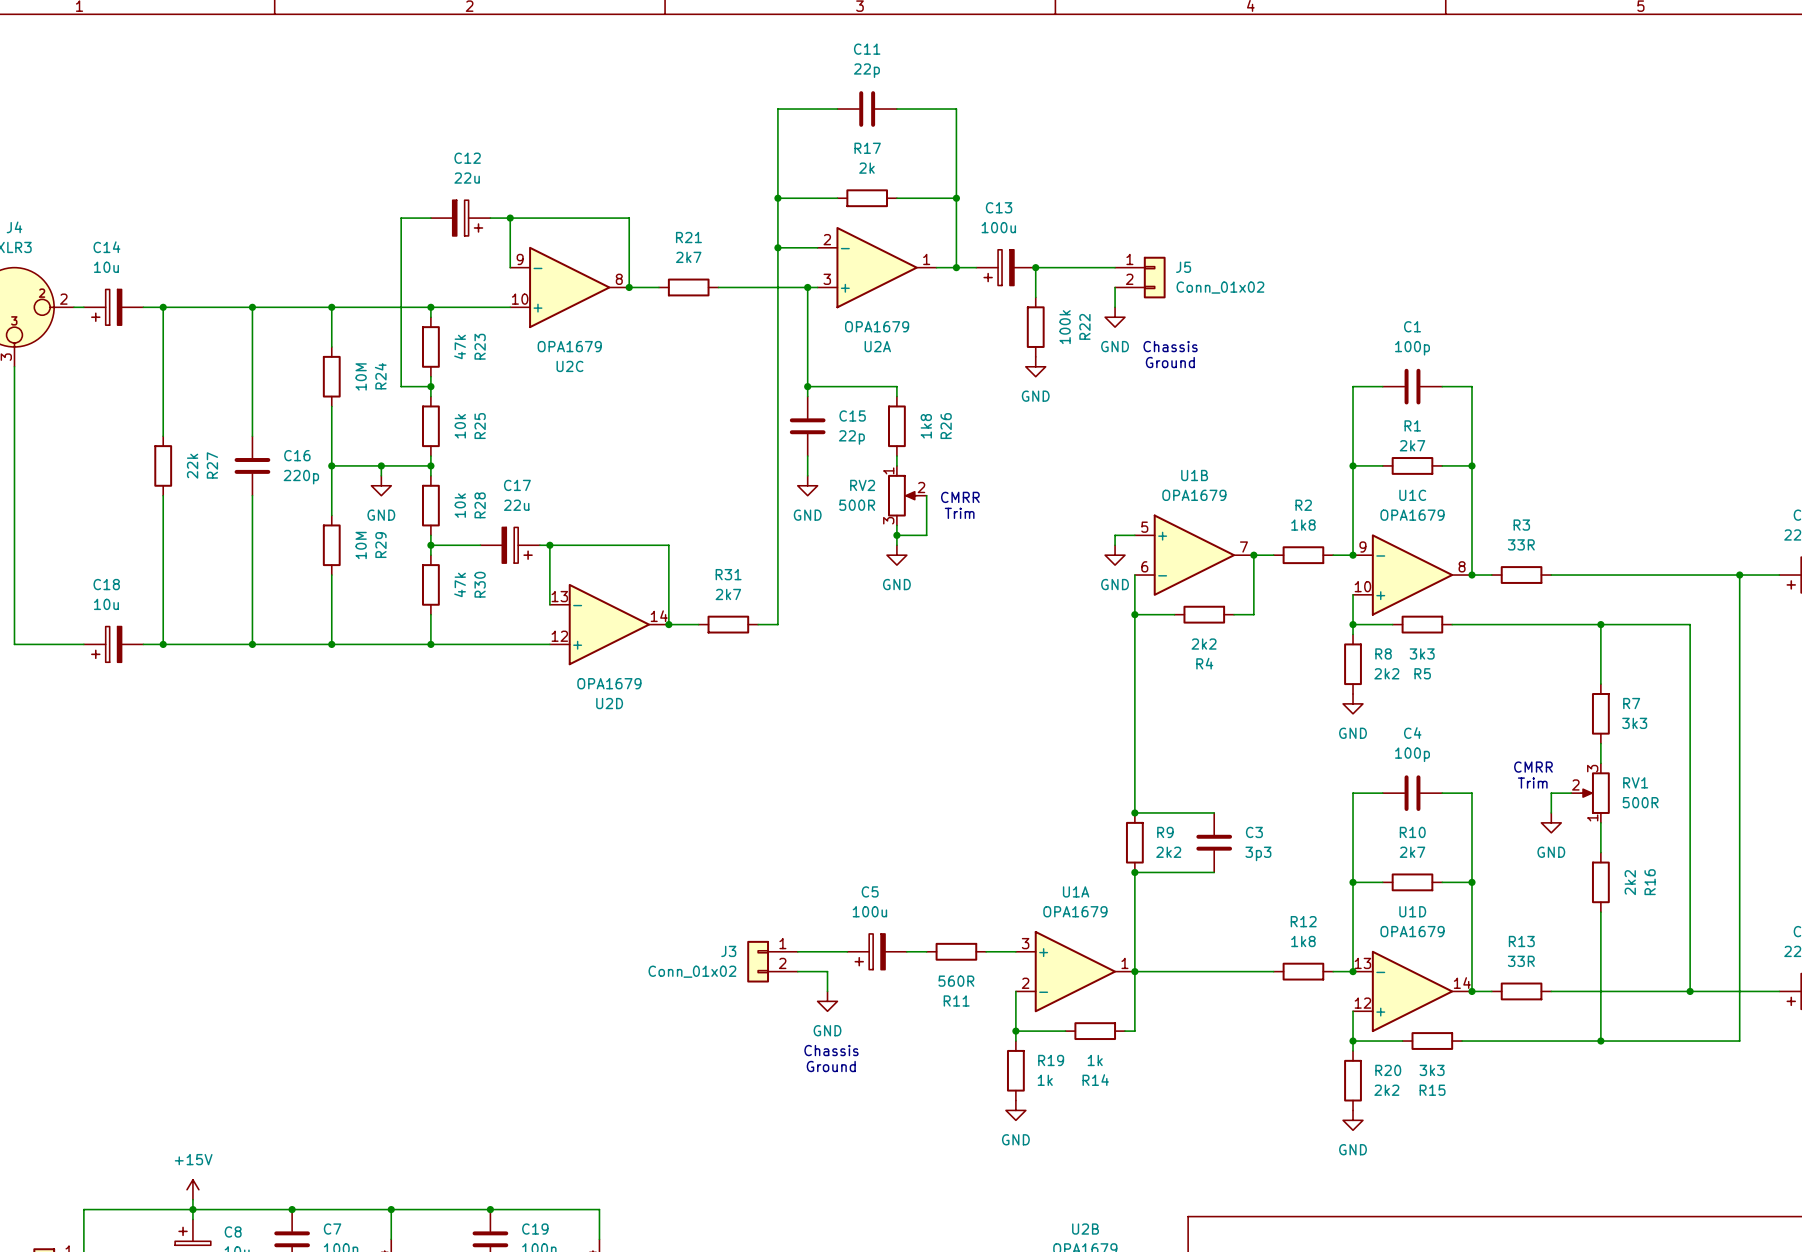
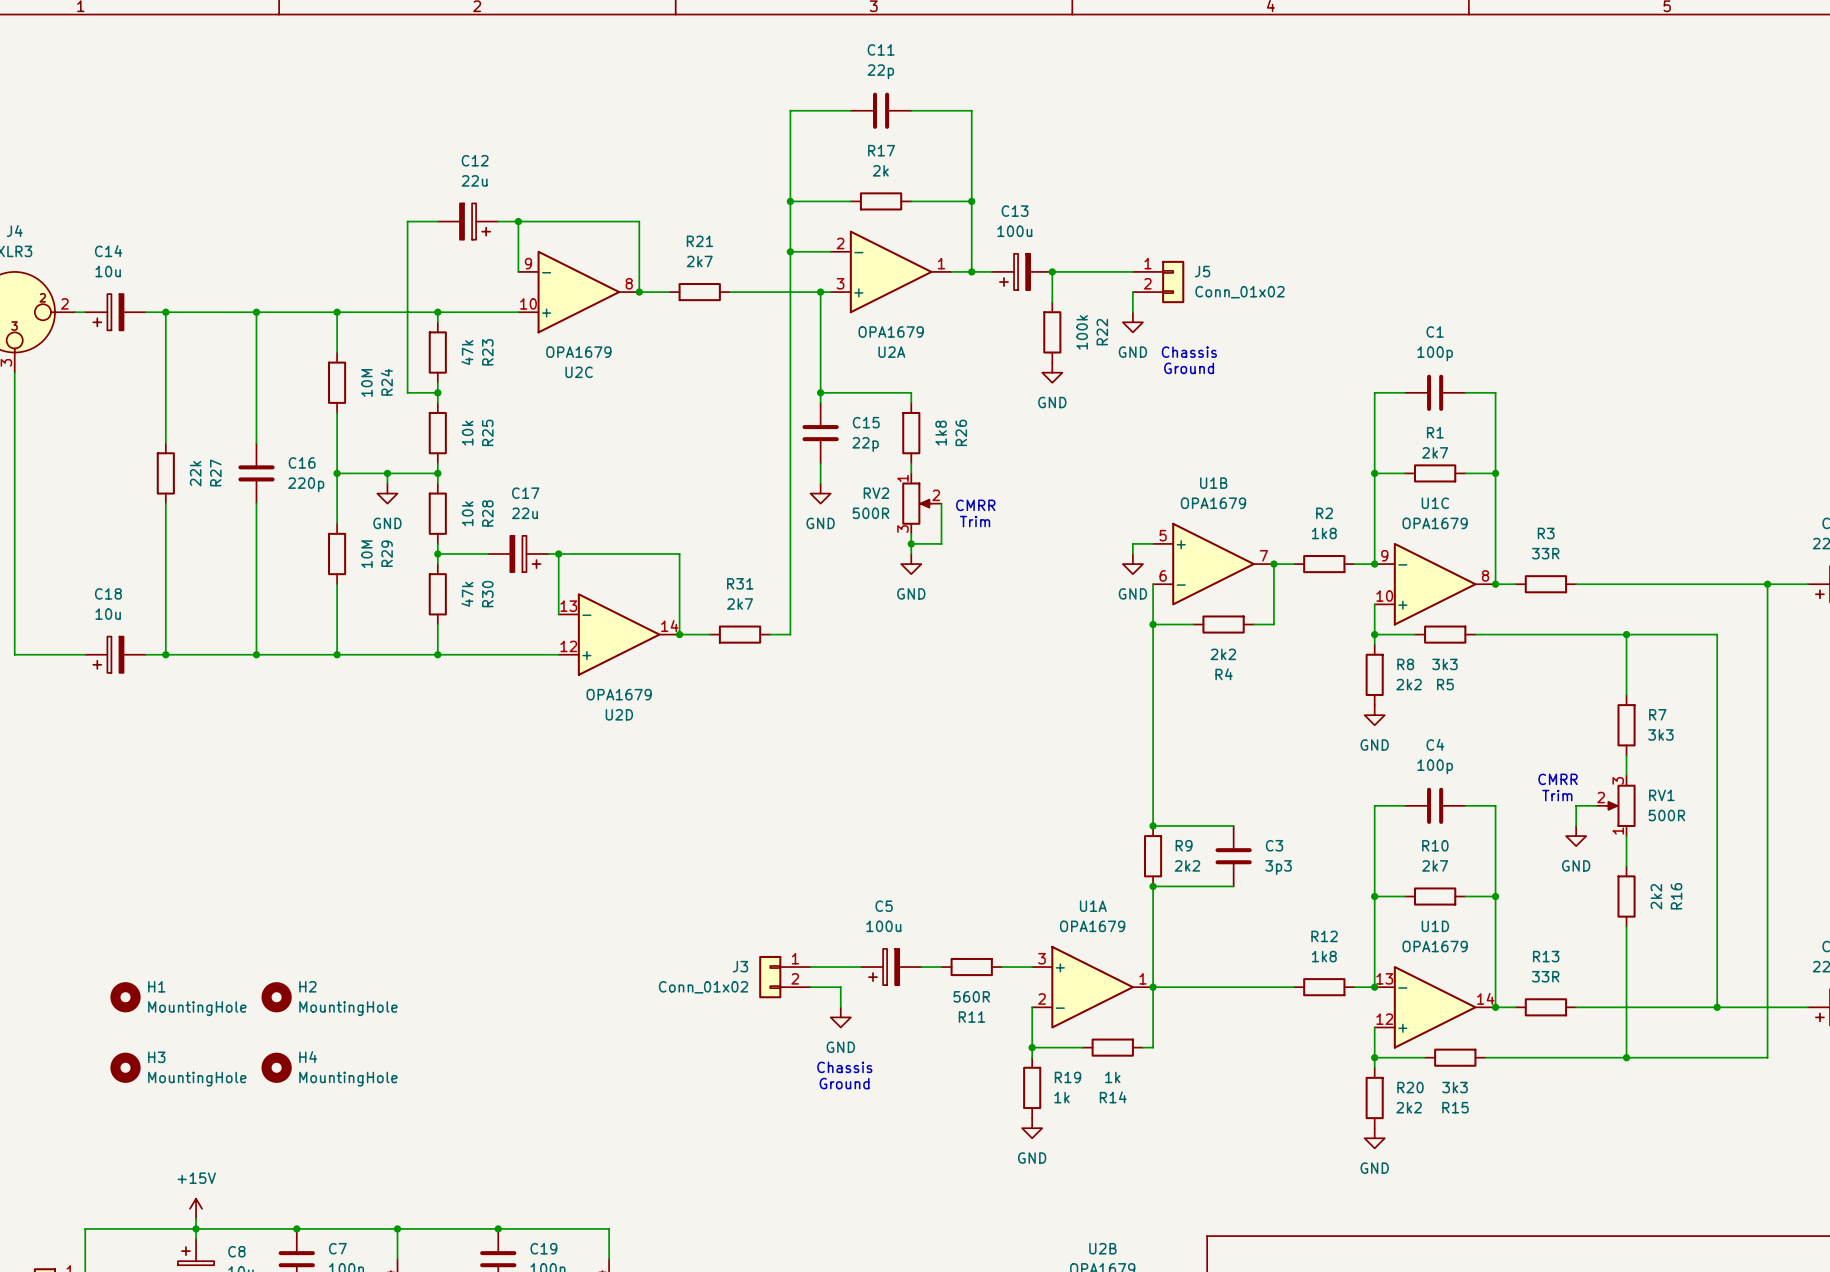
H1: none -> MountingHole (125, 997)
H2: none -> MountingHole (276, 997)
H3: none -> MountingHole (125, 1067)
H4: none -> MountingHole (276, 1067)

